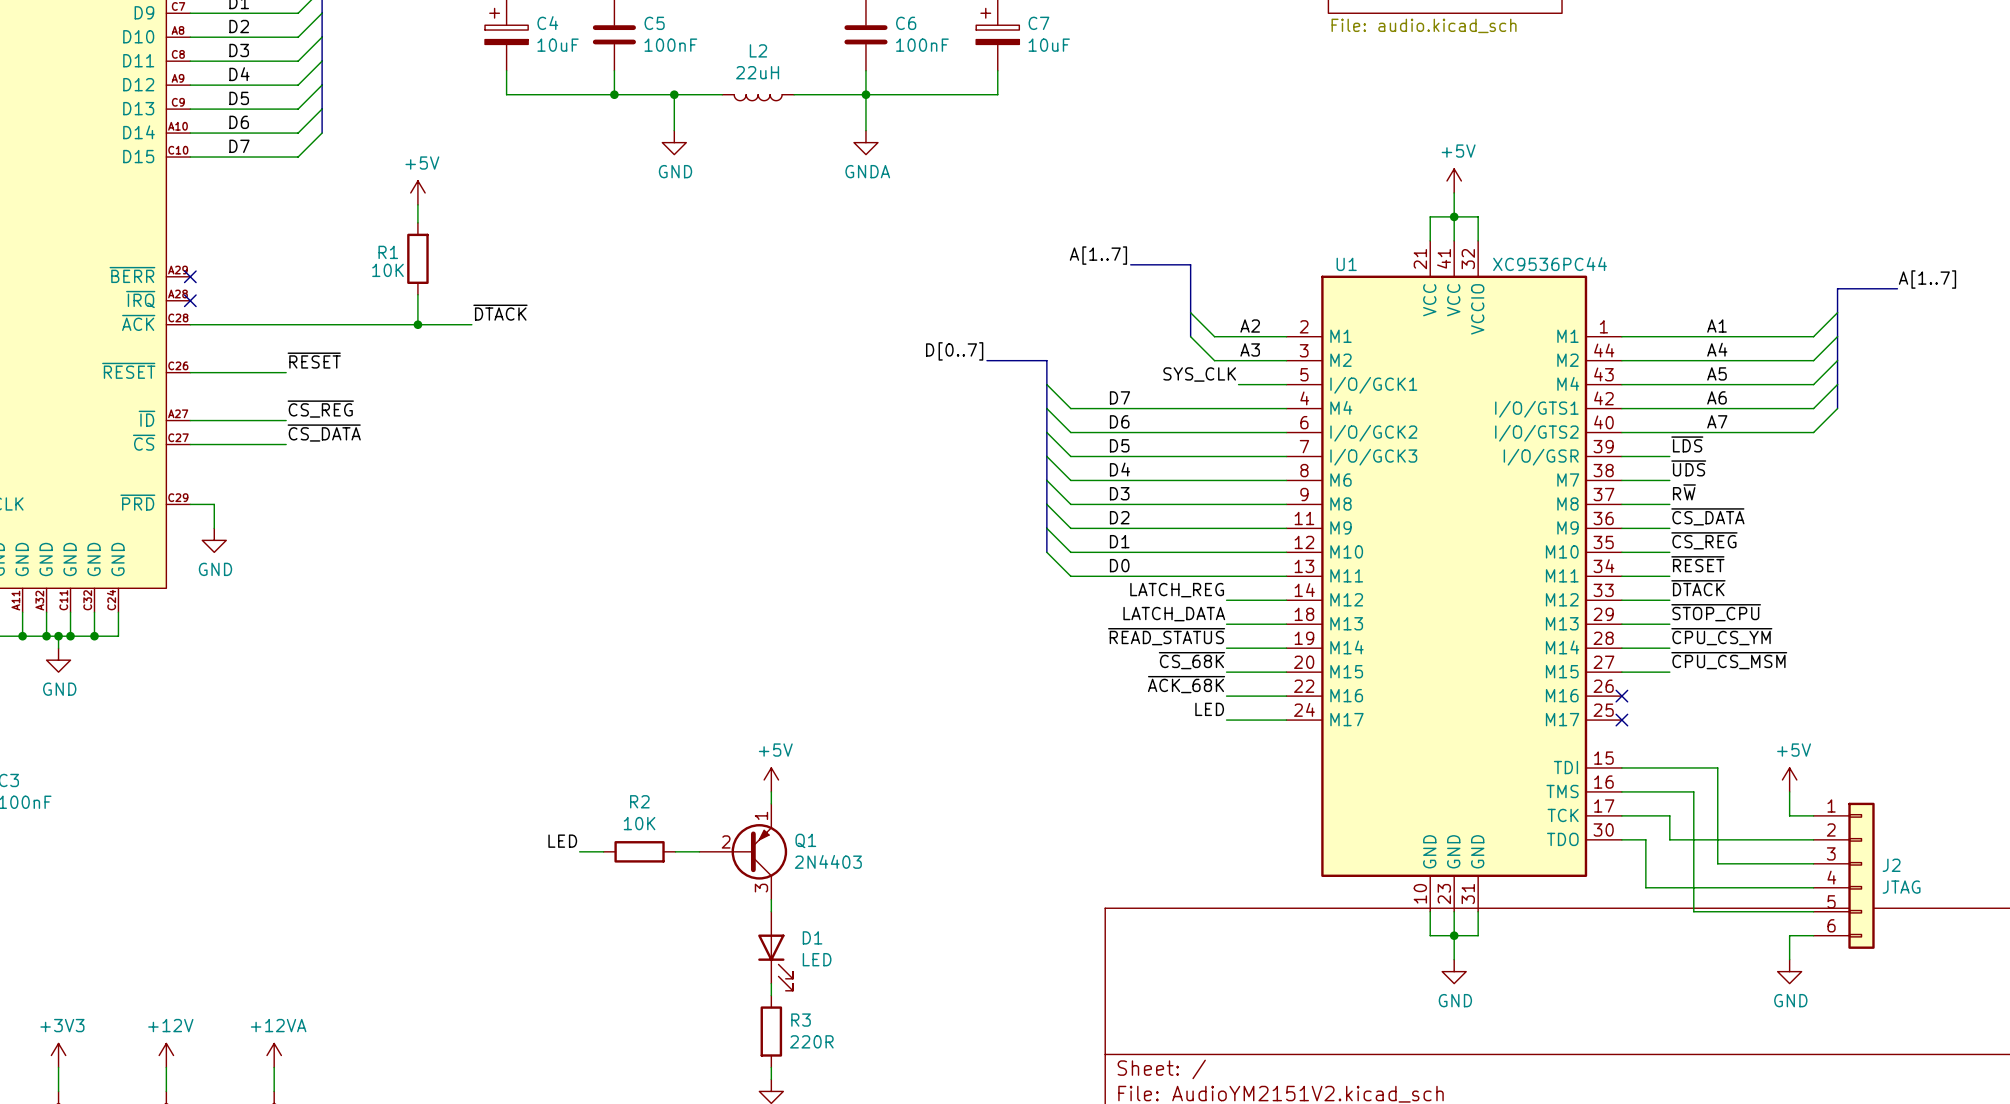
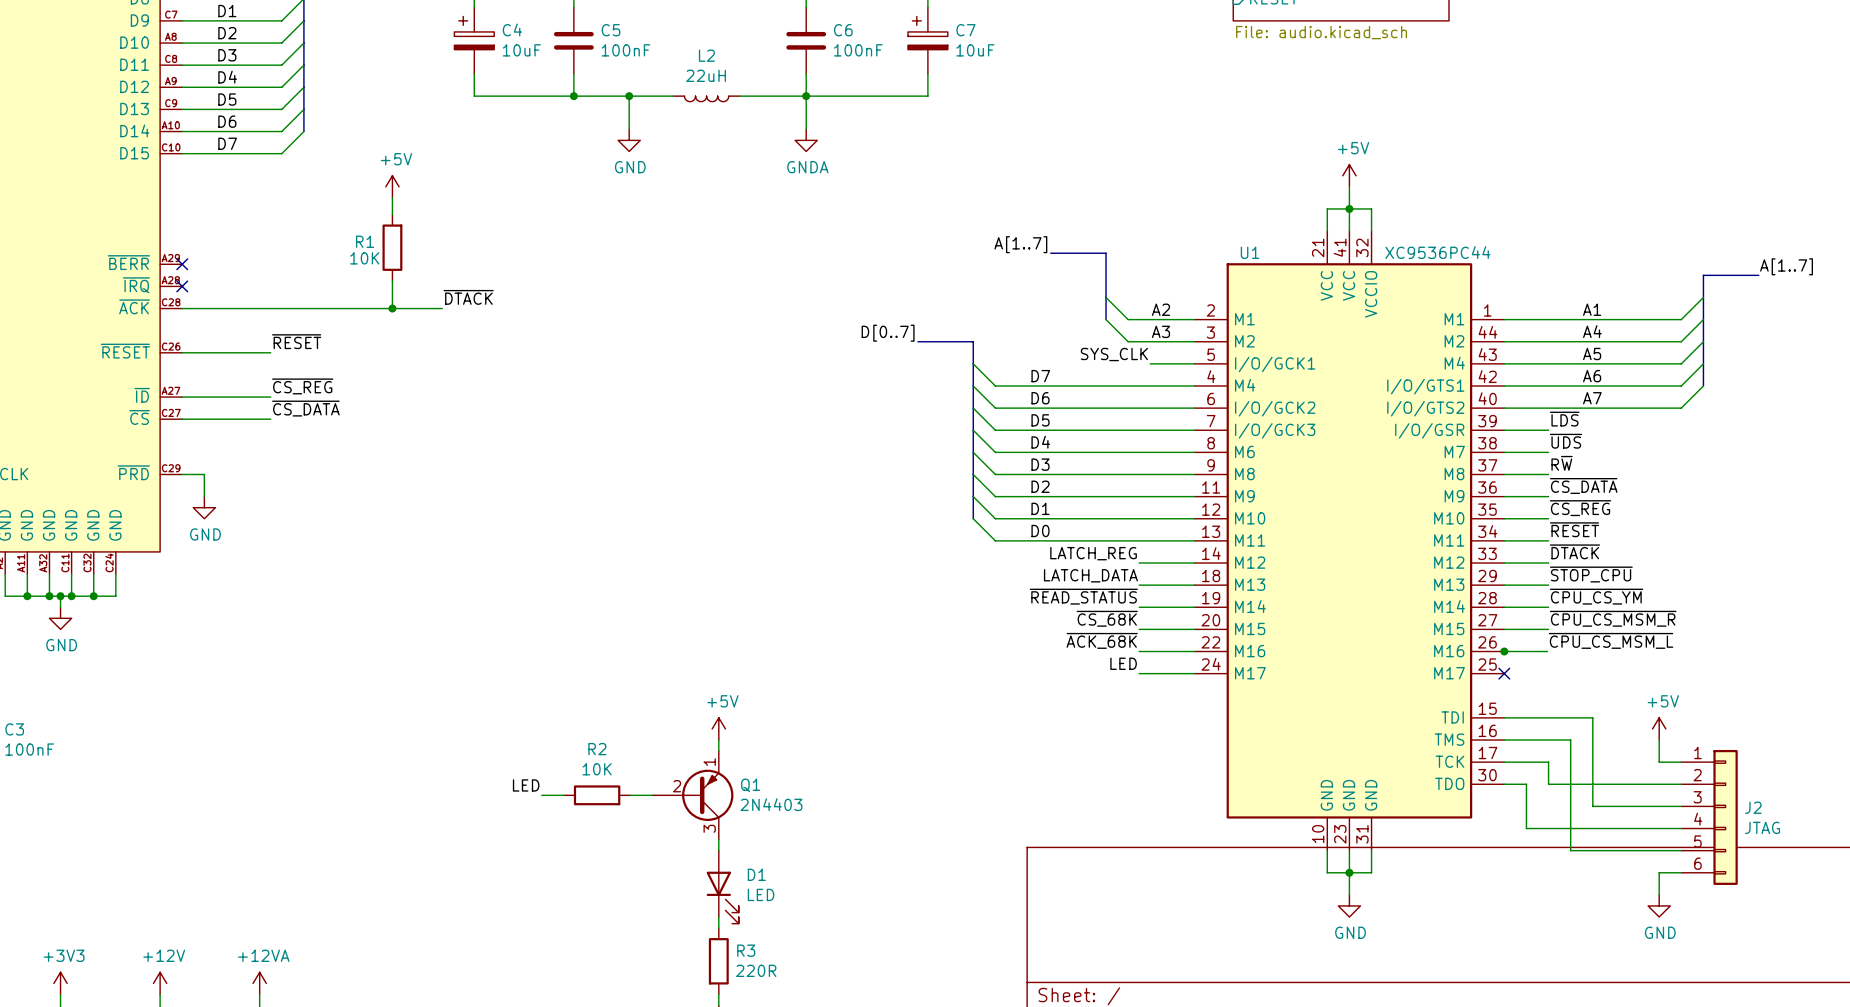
label: ~{CPU_CS_MSM} (1729, 660) -> ~{CPU_CS_MSM_R} (1613, 618)
label: none -> ~{CPU_CS_MSM_L} (1611, 640)
wire: none -> (1503, 651) (1547, 651)
no-connect mark: (1621, 696) -> none
junction: none -> (1504, 651)

